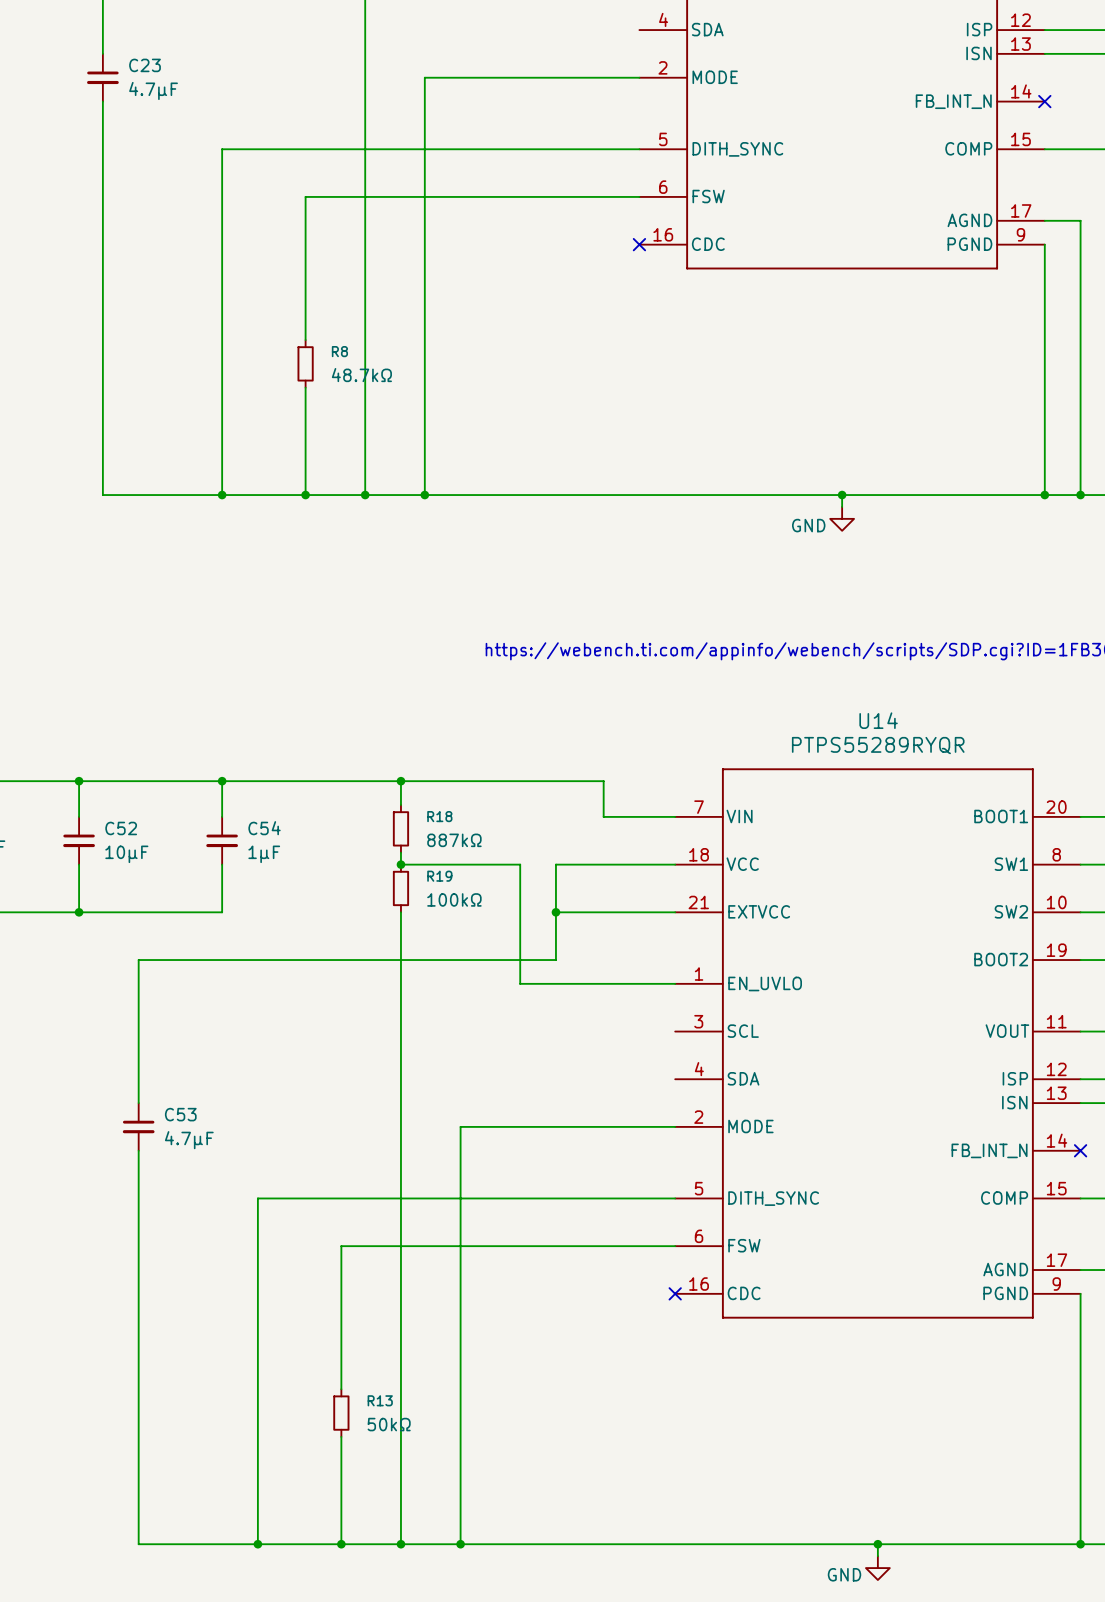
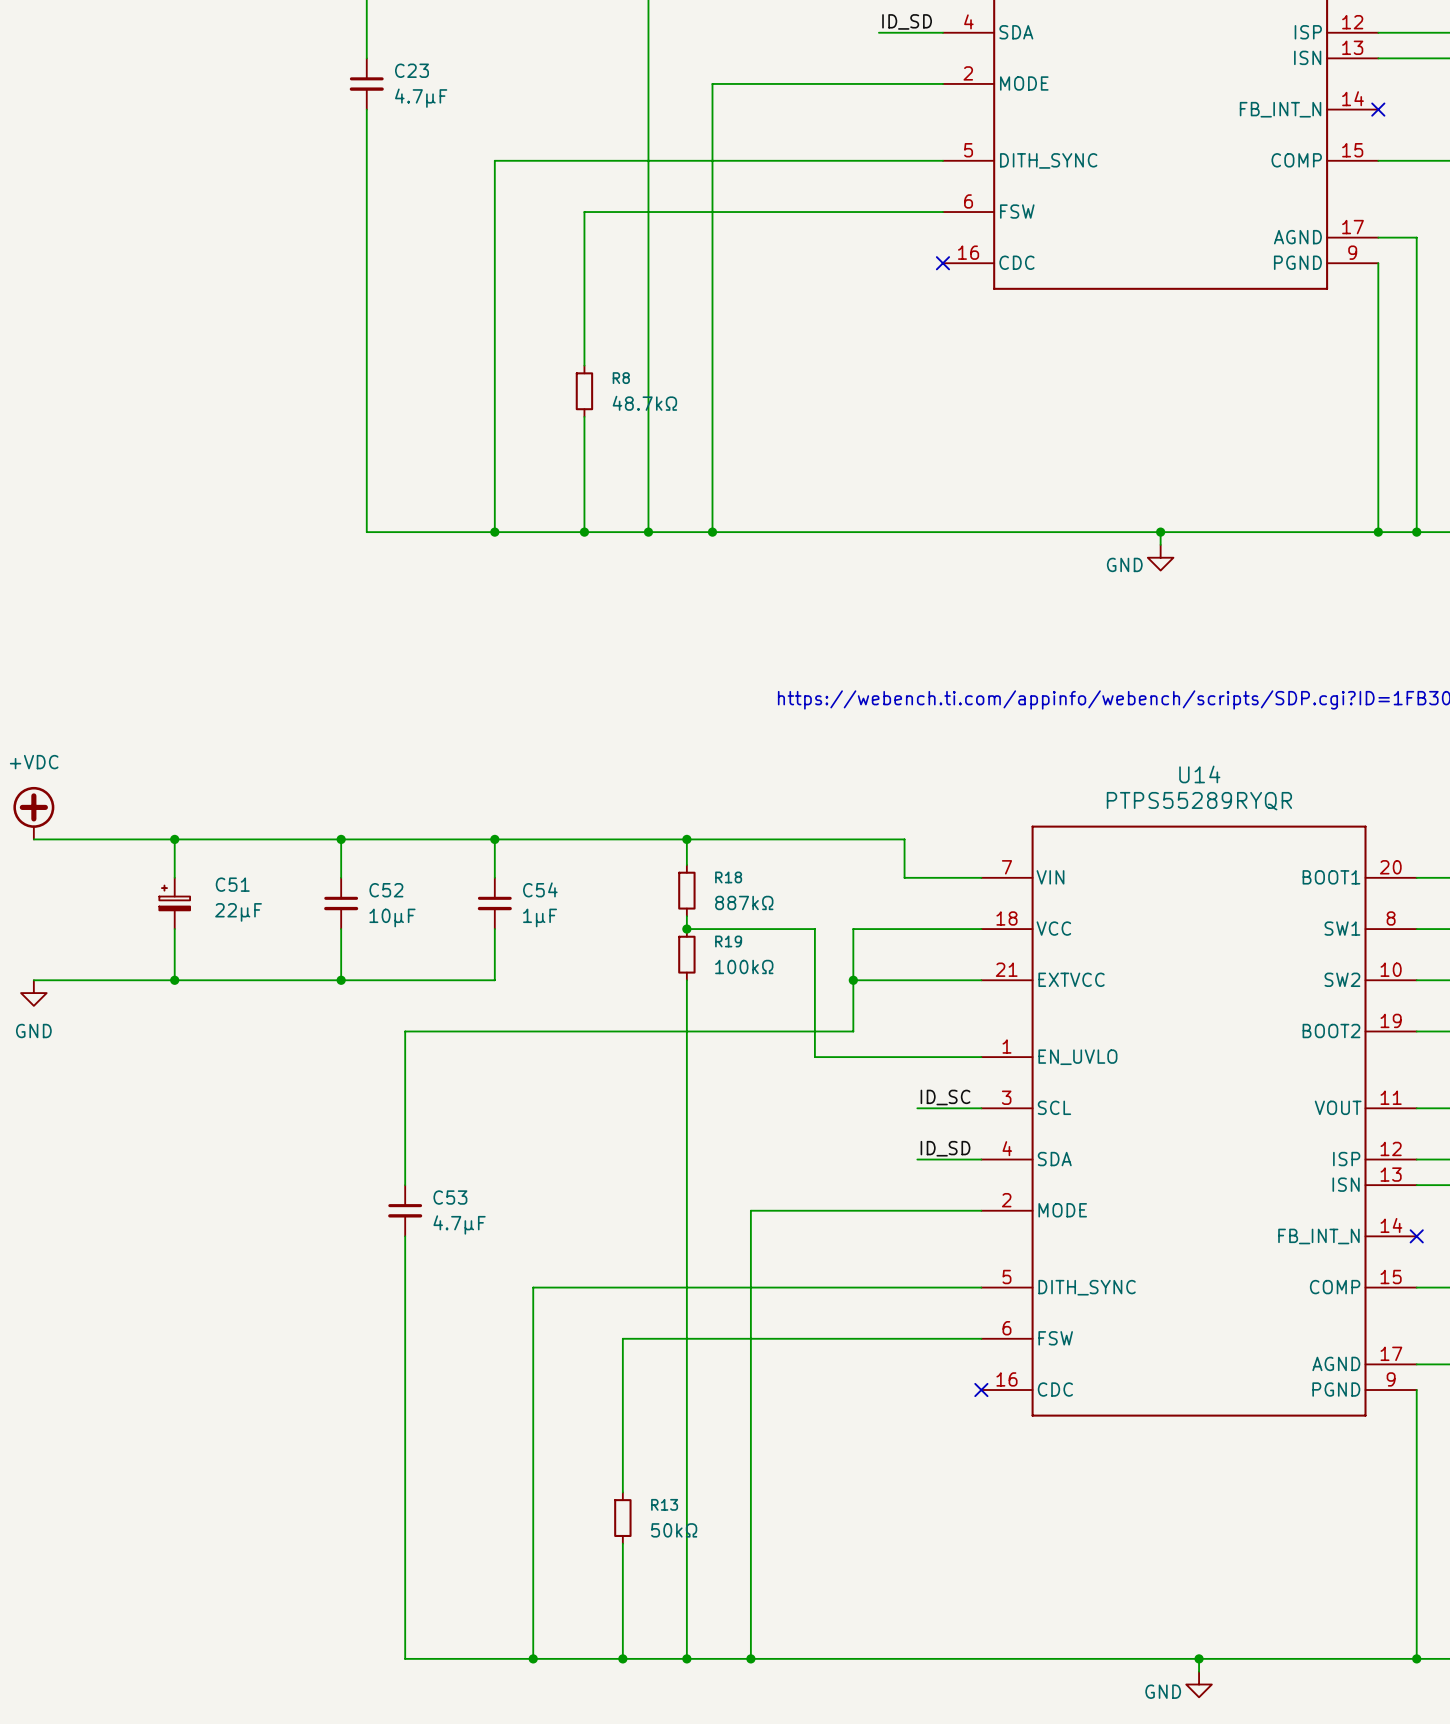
label: none -> ID_SD (907, 21)
wire: none -> (878, 32) (942, 32)
label: none -> ID_SC (945, 1097)
wire: none -> (917, 1108) (981, 1108)
label: none -> ID_SD (945, 1148)
wire: none -> (917, 1159) (981, 1159)

